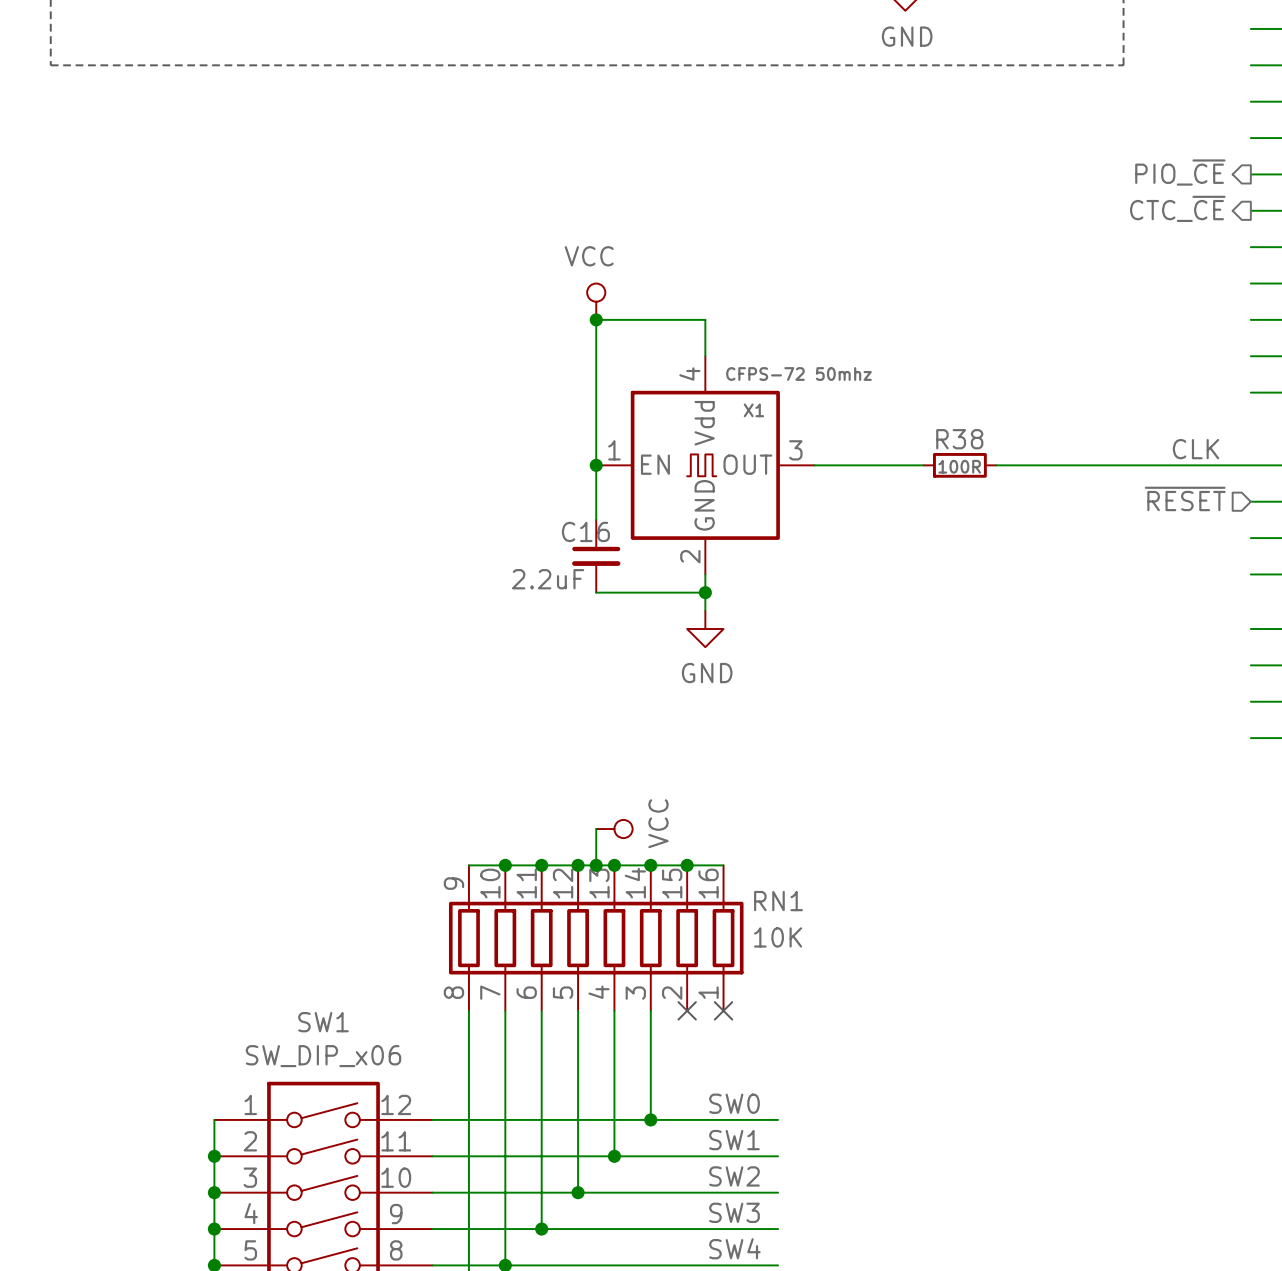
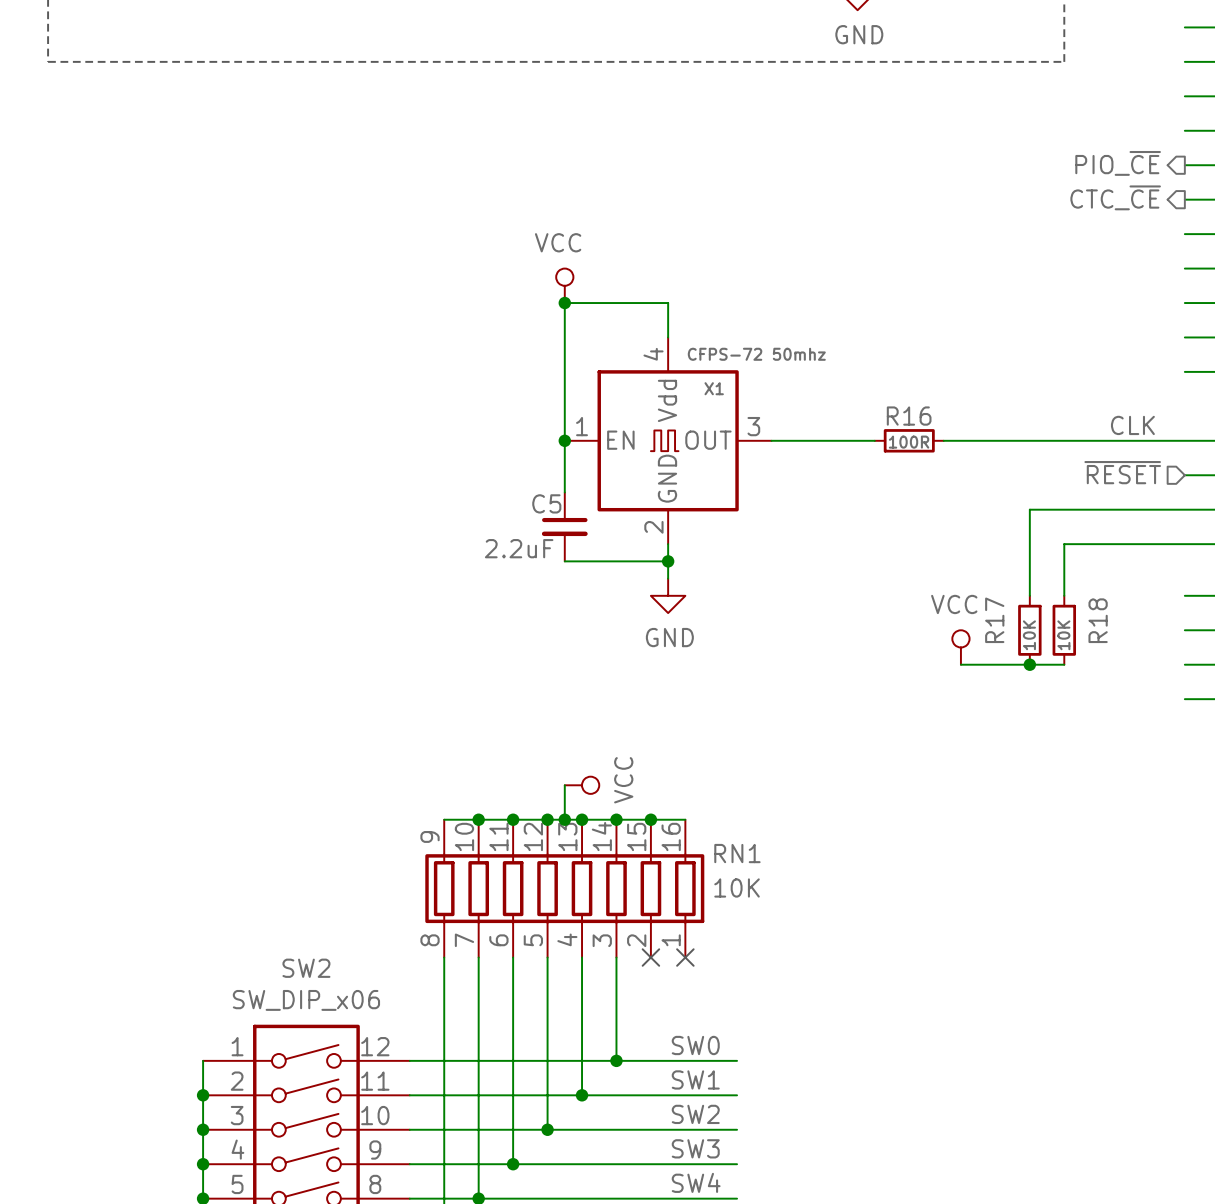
R38 name: R38 (959, 439) -> R16 (909, 416)
C16 name: C16 (585, 531) -> C5 (546, 503)
wire: none -> (1184, 509) (1029, 509) (1029, 595)
wire: none -> (1184, 544) (1064, 544) (1064, 595)
R17: none -> 10K (1029, 630)
R18: none -> 10K (1064, 630)
power symbol: none -> VCC (960, 647)
wire: none -> (960, 664) (1064, 664)
junction: none -> (1029, 664)
SW1 name: SW1 (323, 1022) -> SW2 (306, 968)

